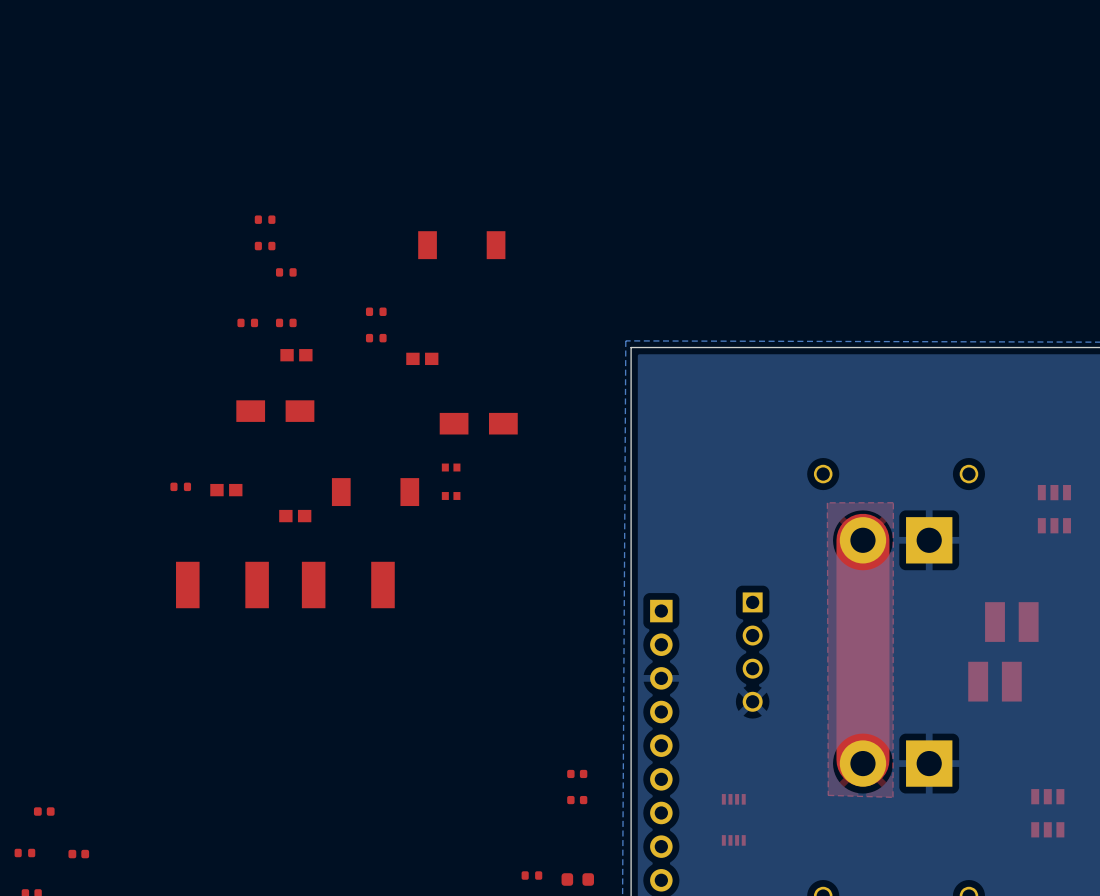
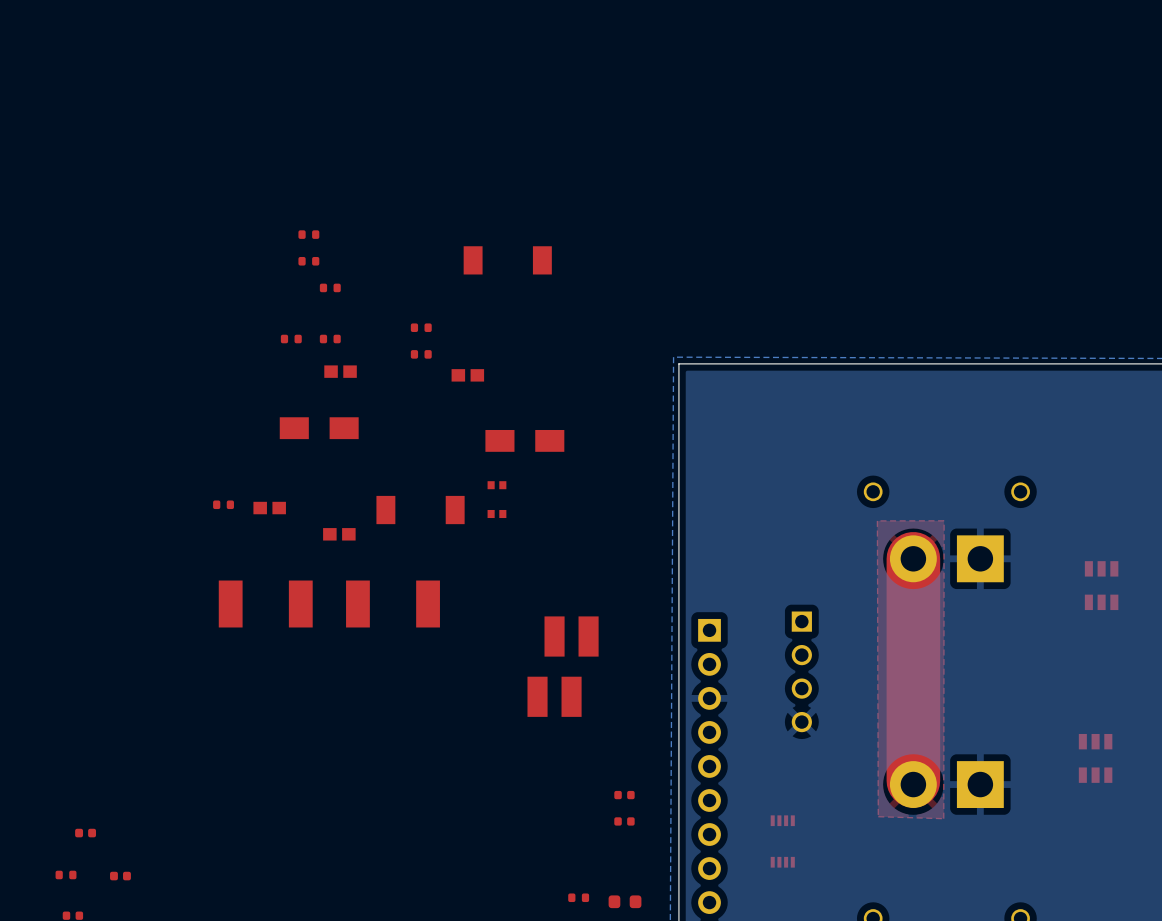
part position: (1054, 509) -> (1101, 585)
part: none -> (563, 666)
part: (1003, 651) -> none
part position: (1047, 813) -> (1095, 758)

